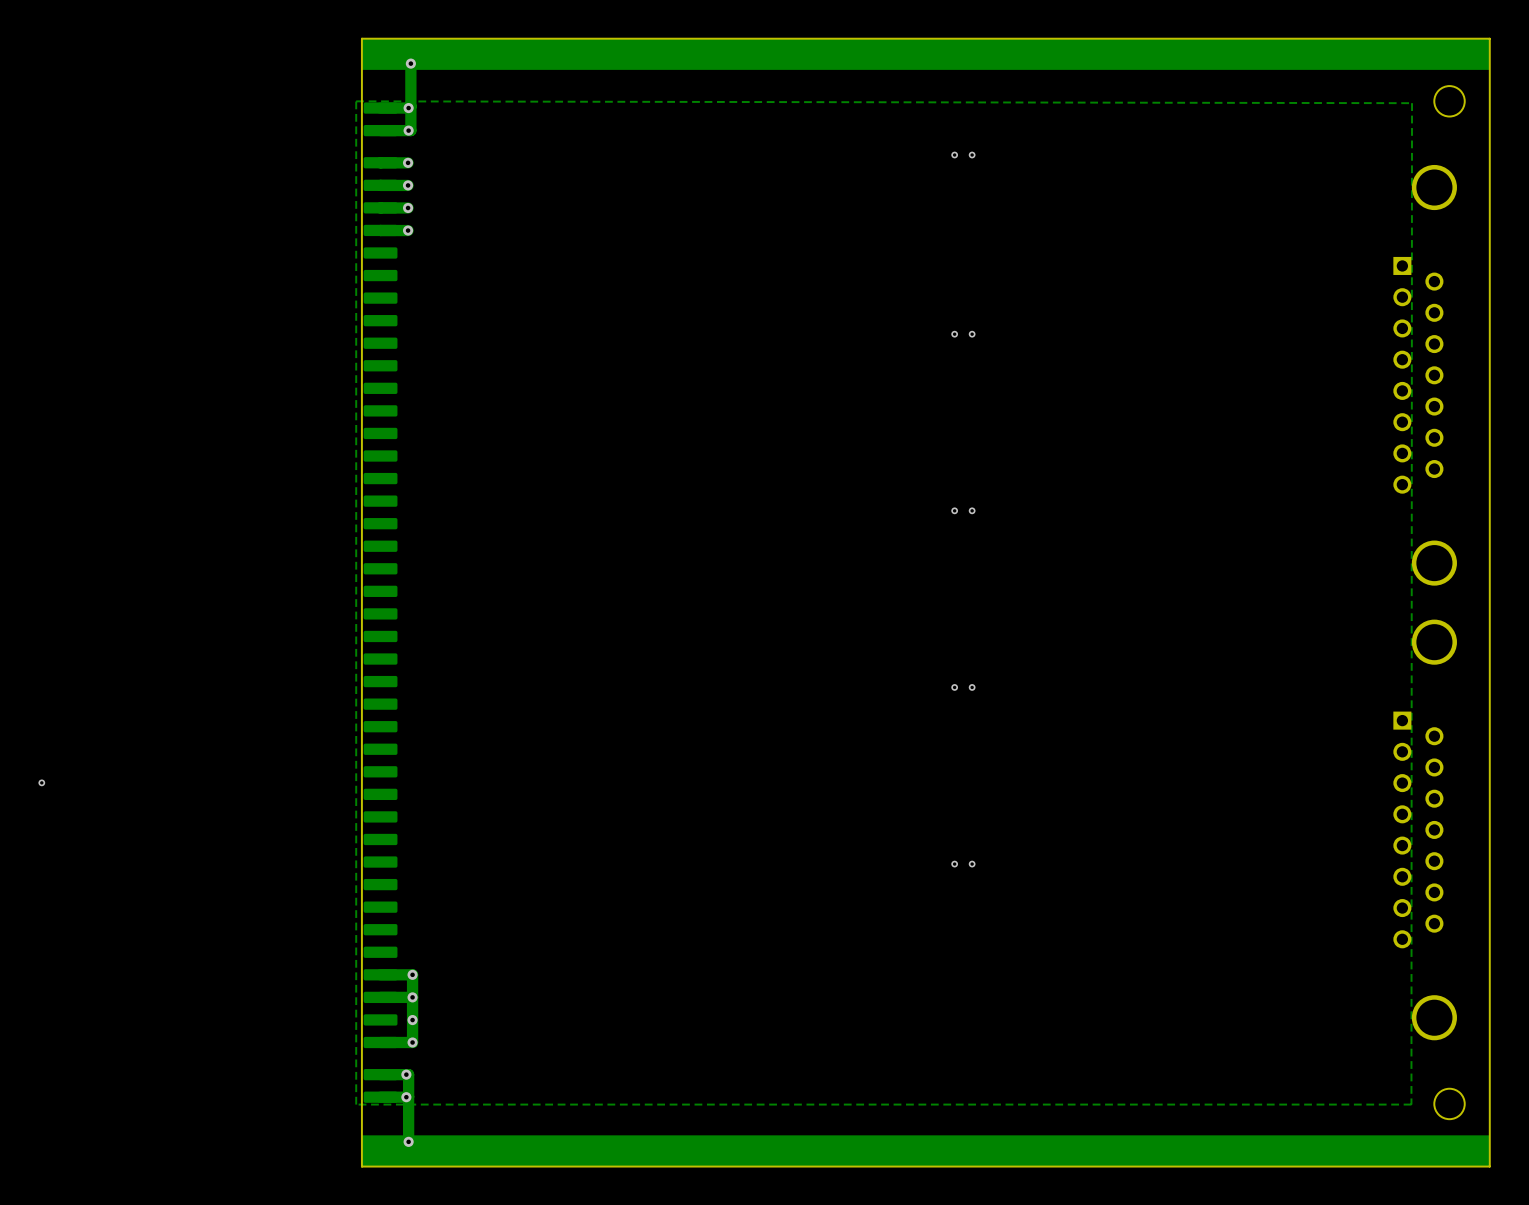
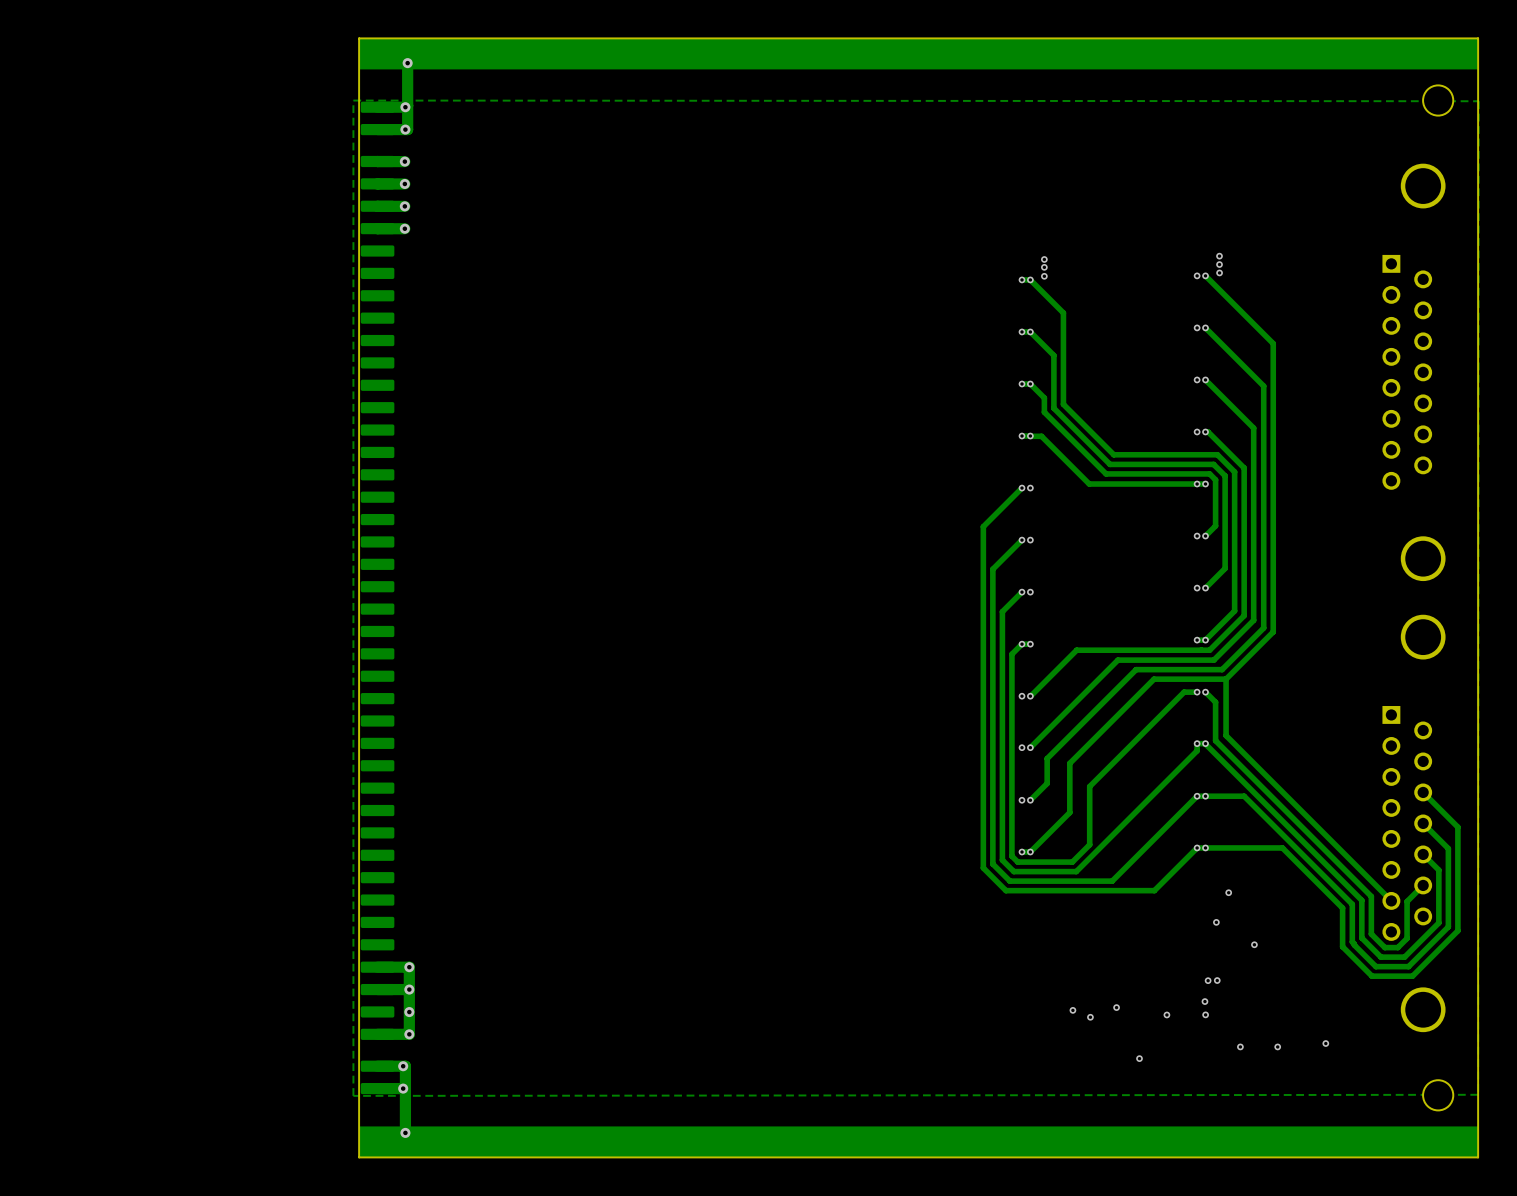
zone outline: (356, 101) (1412, 103) (1411, 1104) (356, 1104) -> (353, 100) (1478, 101) (1478, 1094) (353, 1095)
via: (954, 155) -> none
via: (972, 155) -> none
via: none -> (1219, 256)
via: none -> (1044, 259)
via: none -> (1219, 264)
via: none -> (1044, 267)
via: none -> (1219, 272)
via: none -> (1044, 276)
via: none -> (1197, 275)
track: none -> (1205, 275) (1273, 343) (1273, 631) (1226, 679)
via: none -> (1205, 275)
track: none -> (1021, 279) (1030, 279) (1063, 312) (1063, 404) (1113, 454) (1217, 454) (1234, 471) (1234, 610) (1205, 640) (1197, 640)
via: none -> (1021, 279)
via: none -> (1030, 279)
via: none -> (1197, 327)
track: none -> (1205, 327) (1263, 386) (1263, 628) (1222, 669) (1136, 669) (1047, 758) (1047, 783) (1030, 800)
via: none -> (1205, 327)
via: (954, 334) -> none
via: (972, 334) -> none
track: none -> (1021, 331) (1030, 331) (1053, 355) (1053, 408) (1110, 464) (1213, 464) (1225, 475) (1225, 568) (1205, 588)
via: none -> (1021, 331)
via: none -> (1030, 331)
via: none -> (1197, 379)
track: none -> (1205, 379) (1253, 428) (1253, 620) (1213, 660) (1117, 660) (1030, 747)
via: none -> (1205, 379)
track: none -> (1021, 383) (1030, 383) (1044, 397) (1044, 412) (1106, 473) (1209, 473) (1215, 479) (1215, 525) (1205, 536)
via: none -> (1021, 383)
via: none -> (1030, 383)
via: none -> (1197, 431)
track: none -> (1205, 431) (1208, 431) (1244, 468) (1244, 615) (1209, 650) (1076, 650) (1030, 696)
via: none -> (1205, 431)
track: none -> (1021, 436) (1041, 436) (1089, 484) (1205, 484)
via: none -> (1021, 436)
via: none -> (1030, 436)
via: none -> (1197, 484)
via: none -> (1205, 484)
track: none -> (1021, 488) (983, 526) (983, 868) (1005, 890) (1154, 890) (1197, 847) (1282, 847) (1342, 908) (1342, 946) (1372, 976) (1412, 976) (1457, 930) (1457, 827) (1423, 792)
via: none -> (1021, 488)
via: none -> (1030, 488)
via: (954, 510) -> none
via: (972, 510) -> none
via: none -> (1197, 536)
via: none -> (1205, 536)
track: none -> (1021, 540) (992, 569) (992, 864) (1009, 881) (1112, 881) (1197, 796) (1244, 796) (1352, 904) (1352, 941) (1354, 945) (1375, 966) (1408, 966) (1448, 926) (1448, 848) (1423, 823)
via: none -> (1021, 540)
via: none -> (1030, 540)
via: none -> (1197, 588)
via: none -> (1205, 588)
track: none -> (1021, 592) (1002, 611) (1002, 860) (1013, 871) (1076, 871) (1197, 750) (1197, 743) (1205, 743) (1361, 900) (1361, 938) (1380, 957) (1404, 957) (1438, 922) (1438, 870) (1423, 854)
via: none -> (1021, 592)
via: none -> (1030, 592)
via: none -> (1197, 640)
via: none -> (1205, 640)
via: none -> (1021, 644)
track: none -> (1030, 644) (1021, 644) (1011, 654) (1011, 856) (1017, 862) (1072, 862) (1089, 844) (1089, 786) (1184, 692) (1197, 692)
via: none -> (1030, 644)
track: none -> (1226, 679) (1154, 679) (1069, 763) (1069, 812) (1030, 852) (1021, 852)
track: none -> (1226, 679) (1226, 735) (1391, 900)
via: (954, 687) -> none
via: (972, 687) -> none
via: none -> (1197, 692)
track: none -> (1205, 692) (1215, 702) (1215, 740) (1371, 896) (1371, 934) (1384, 947) (1397, 947) (1407, 938) (1407, 901) (1423, 885)
via: none -> (1205, 692)
via: none -> (1021, 696)
via: none -> (1030, 696)
via: none -> (1197, 743)
via: none -> (1205, 743)
via: none -> (1021, 747)
via: none -> (1030, 747)
via: (41, 782) -> none
via: none -> (1197, 796)
via: none -> (1205, 796)
via: none -> (1021, 800)
via: none -> (1030, 800)
via: none -> (1197, 847)
via: none -> (1205, 847)
via: none -> (1021, 852)
via: none -> (1030, 852)
via: (954, 864) -> none
via: (972, 864) -> none
via: none -> (1228, 892)
via: none -> (1216, 922)
via: none -> (1254, 944)
via: none -> (1208, 980)
via: none -> (1217, 980)
via: none -> (1204, 1001)
via: none -> (1116, 1007)
via: none -> (1072, 1010)
via: none -> (1166, 1014)
via: none -> (1205, 1014)
via: none -> (1090, 1017)
via: none -> (1325, 1043)
via: none -> (1240, 1046)
via: none -> (1277, 1046)
via: none -> (1139, 1058)

